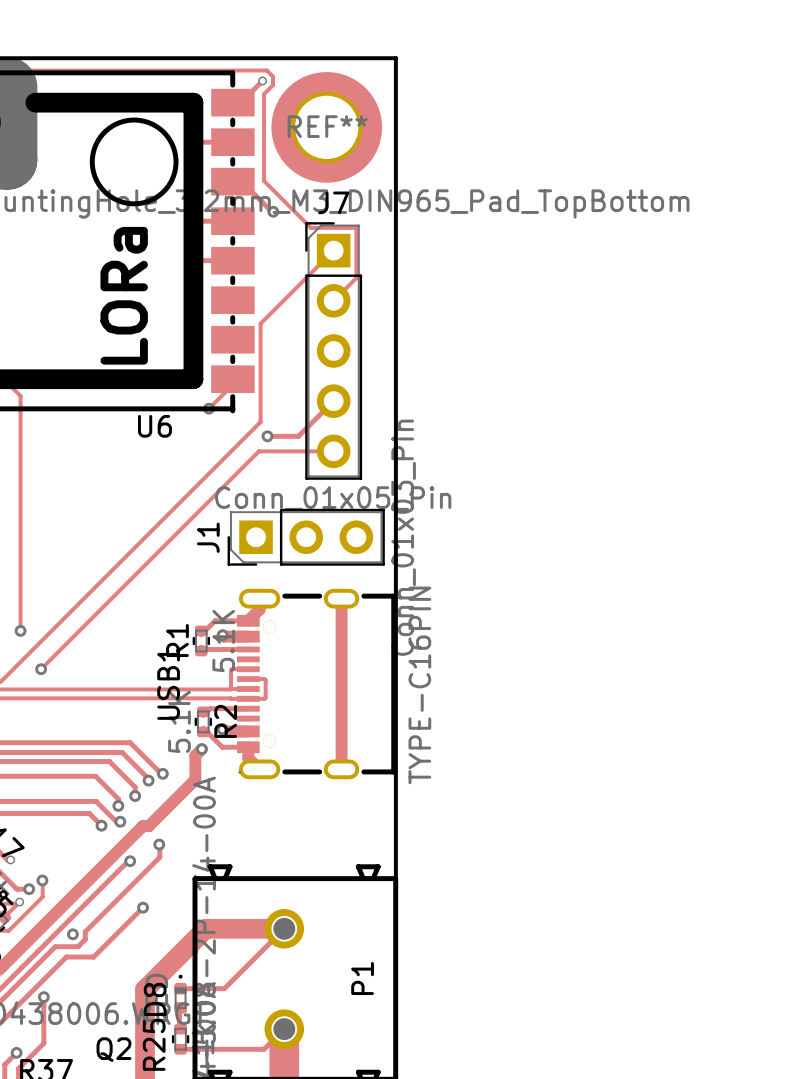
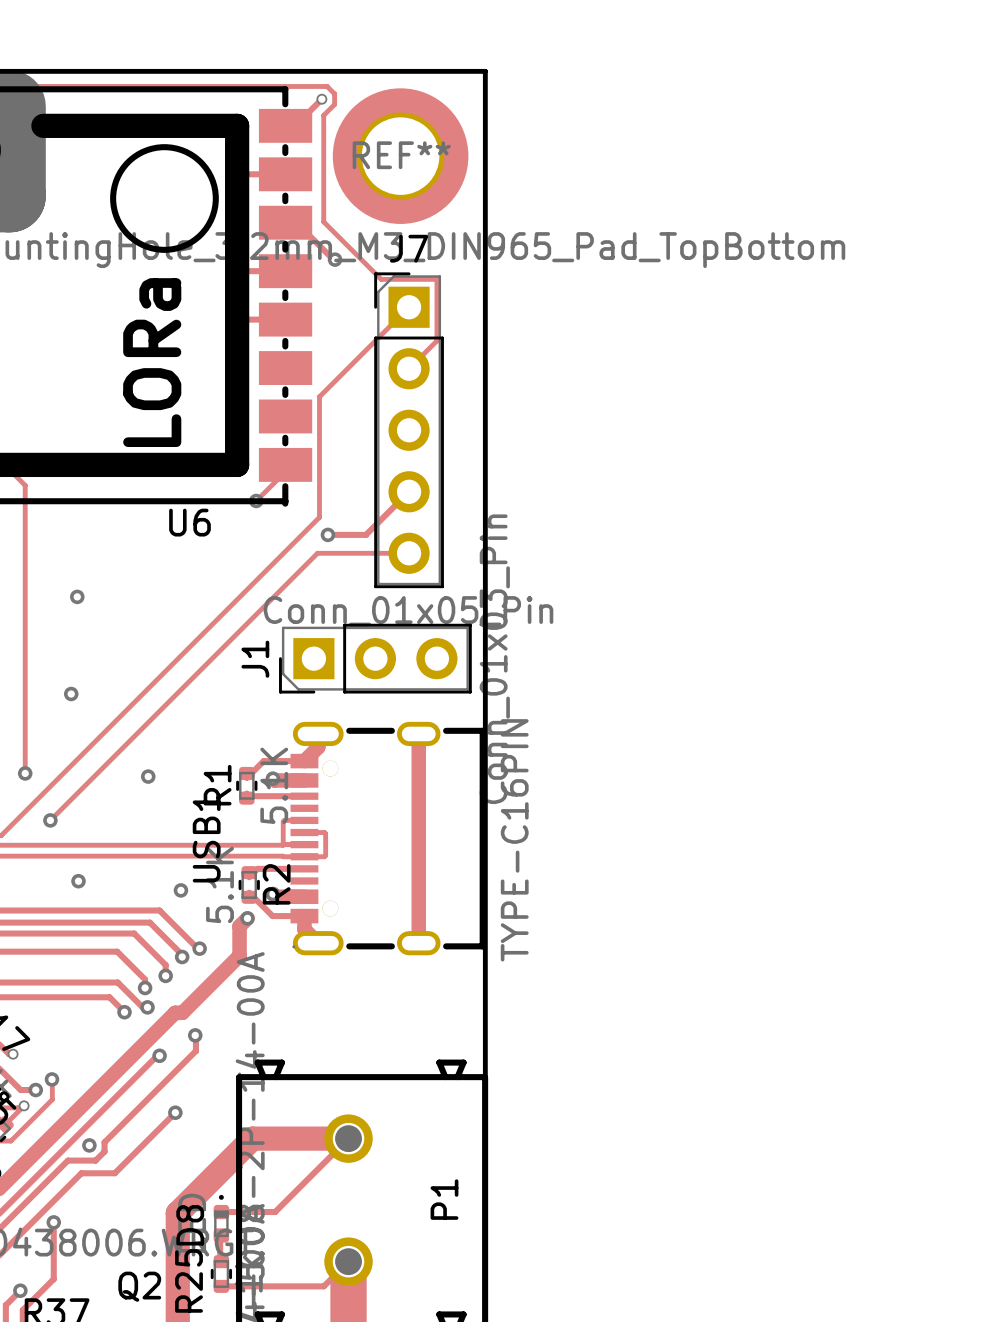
via: none -> (77, 596)
via: none -> (71, 694)
via: none -> (148, 776)
via: none -> (78, 881)
via: none -> (180, 890)

